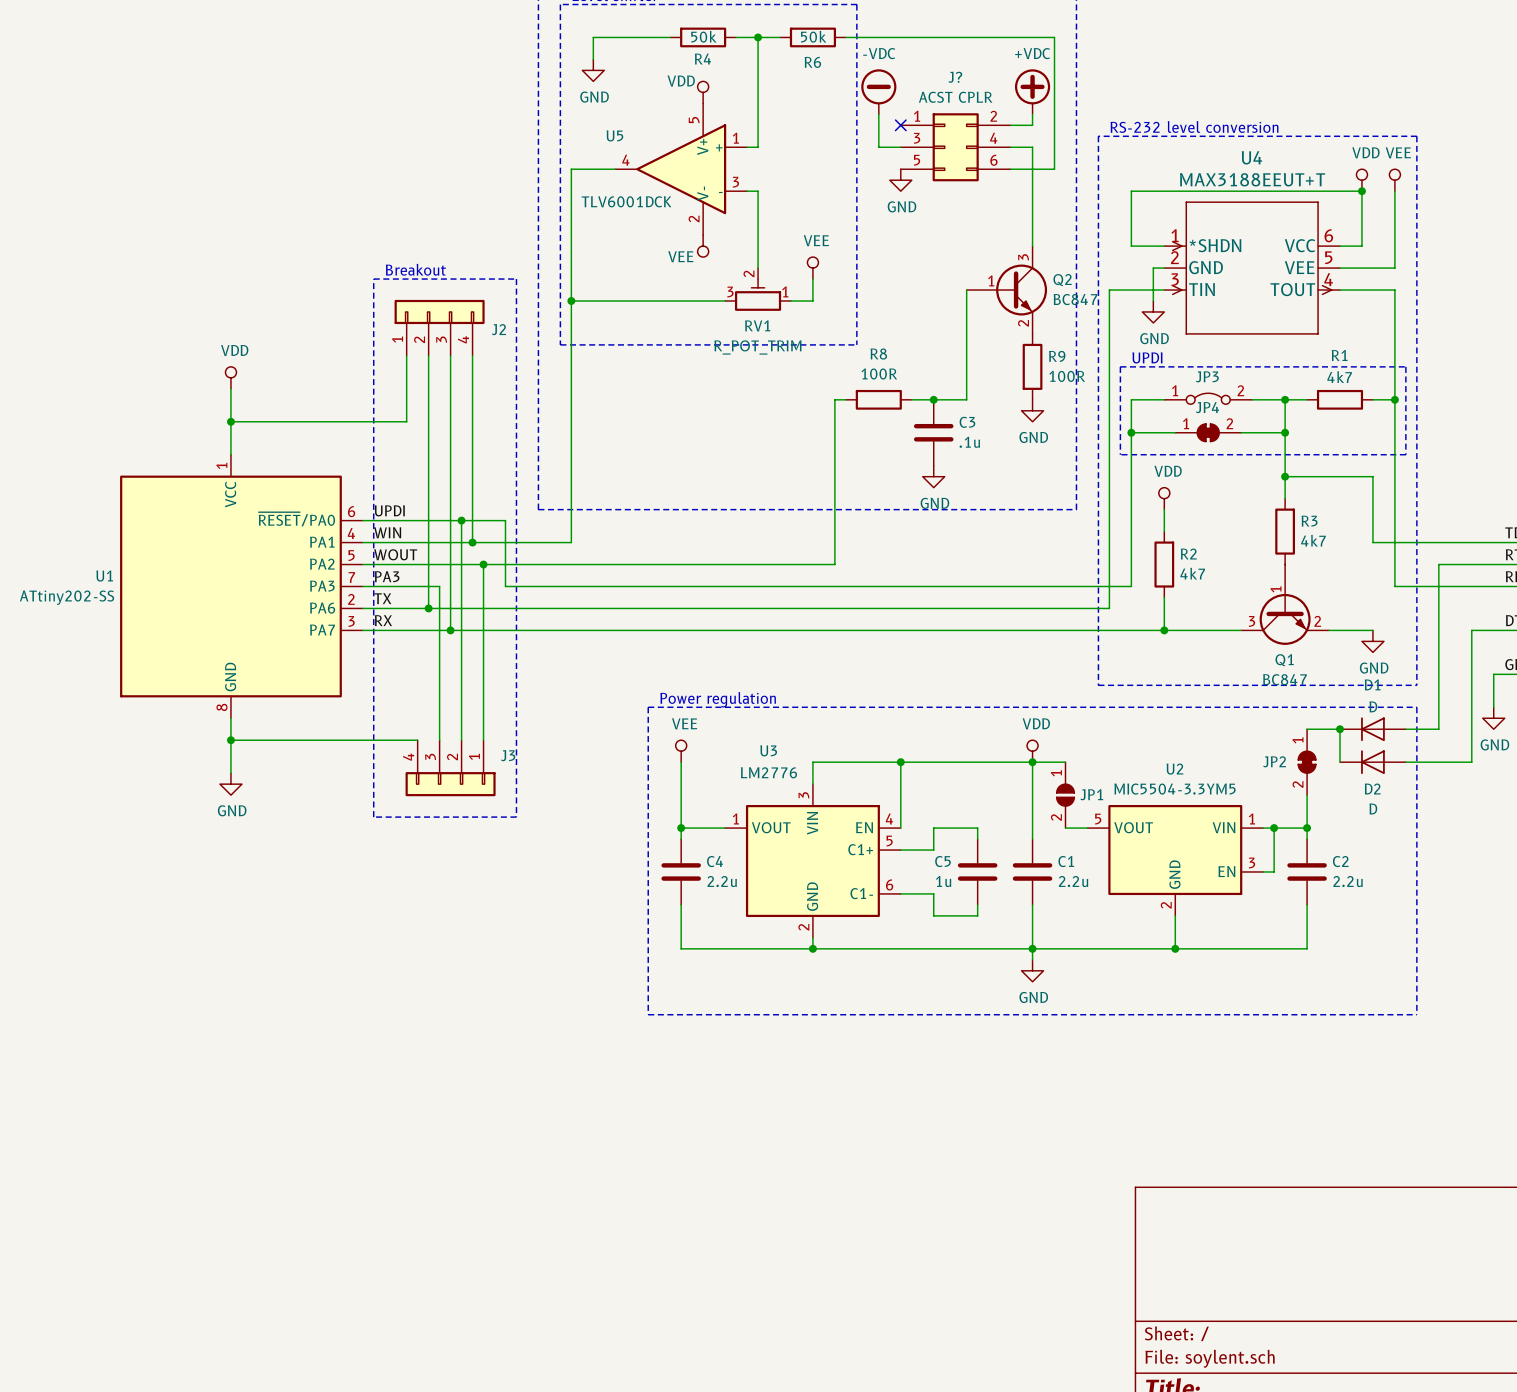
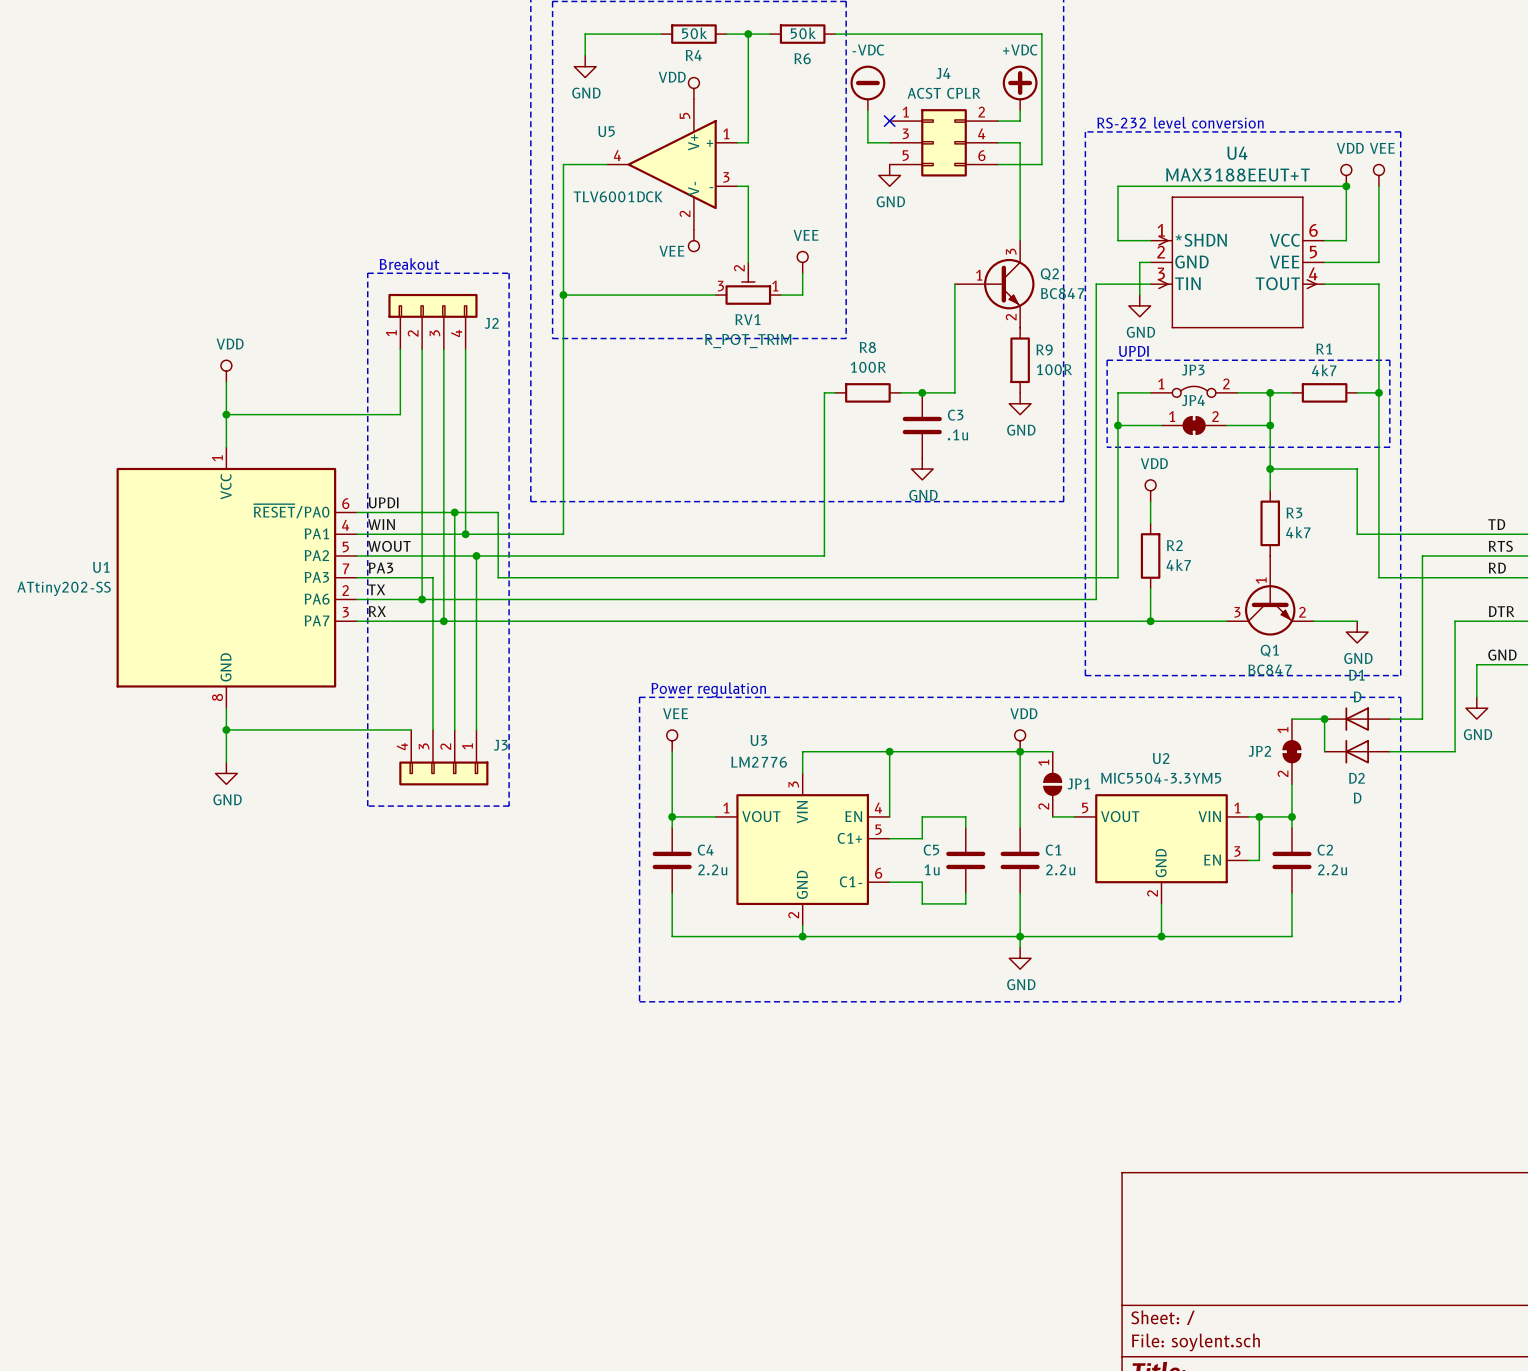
J? name: J? (955, 77) -> J4 (943, 73)

